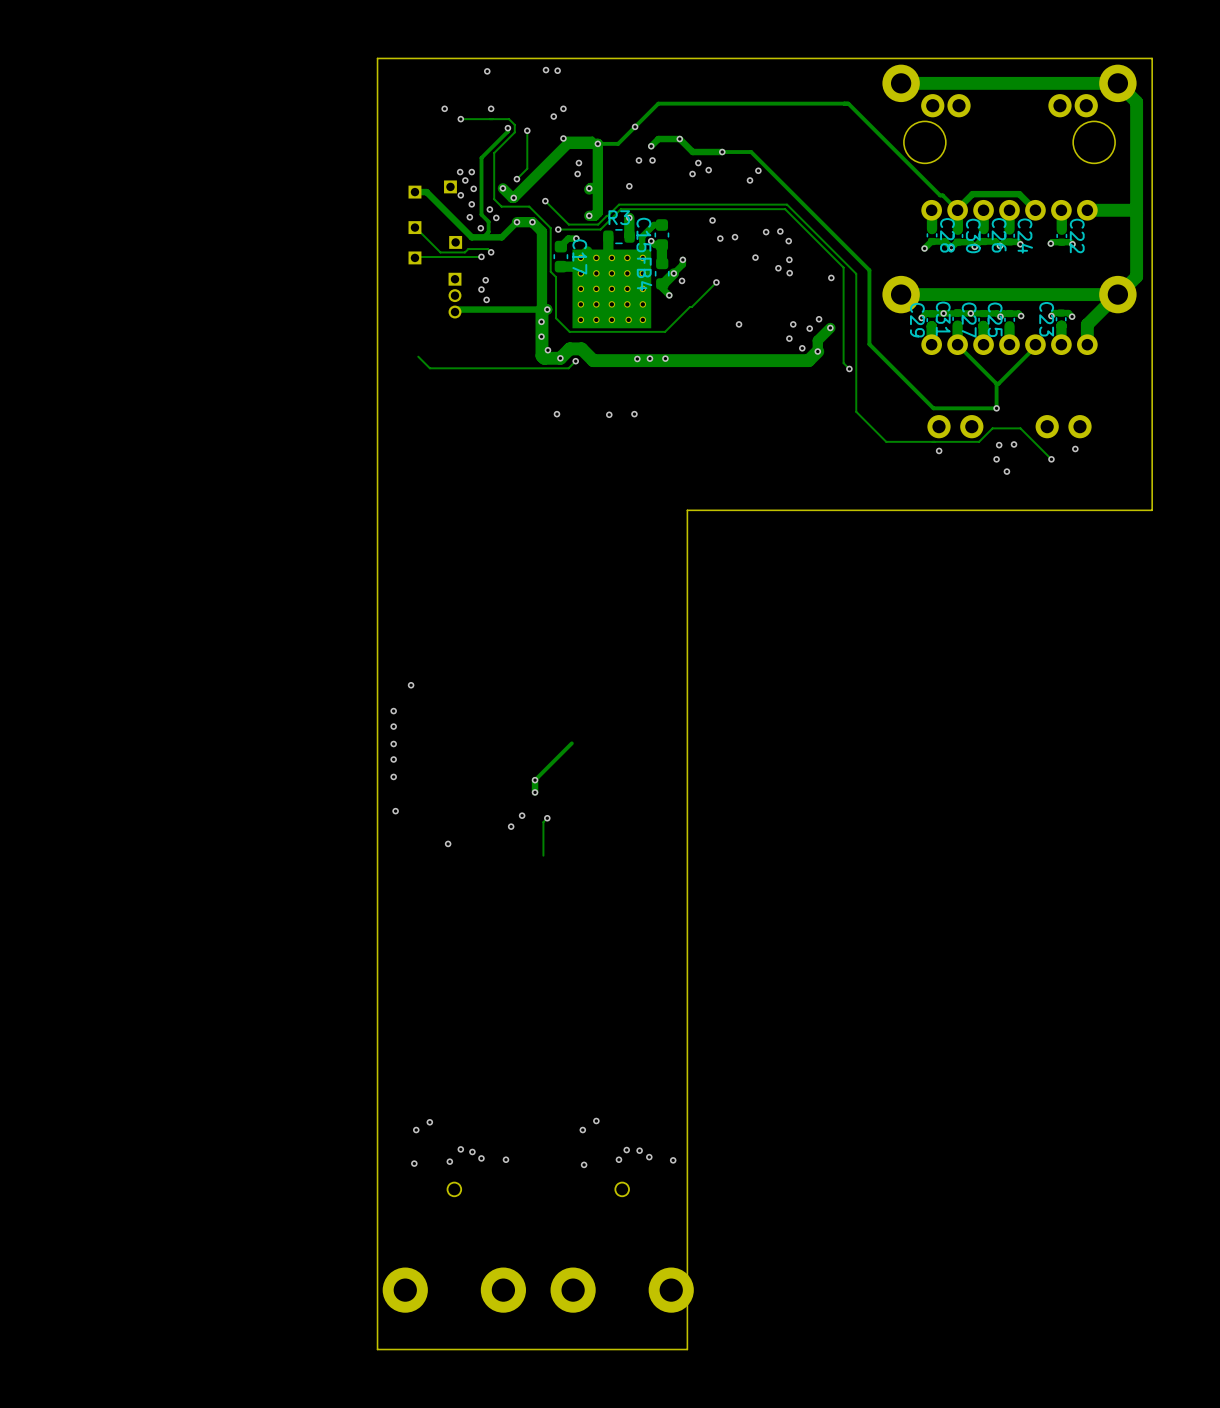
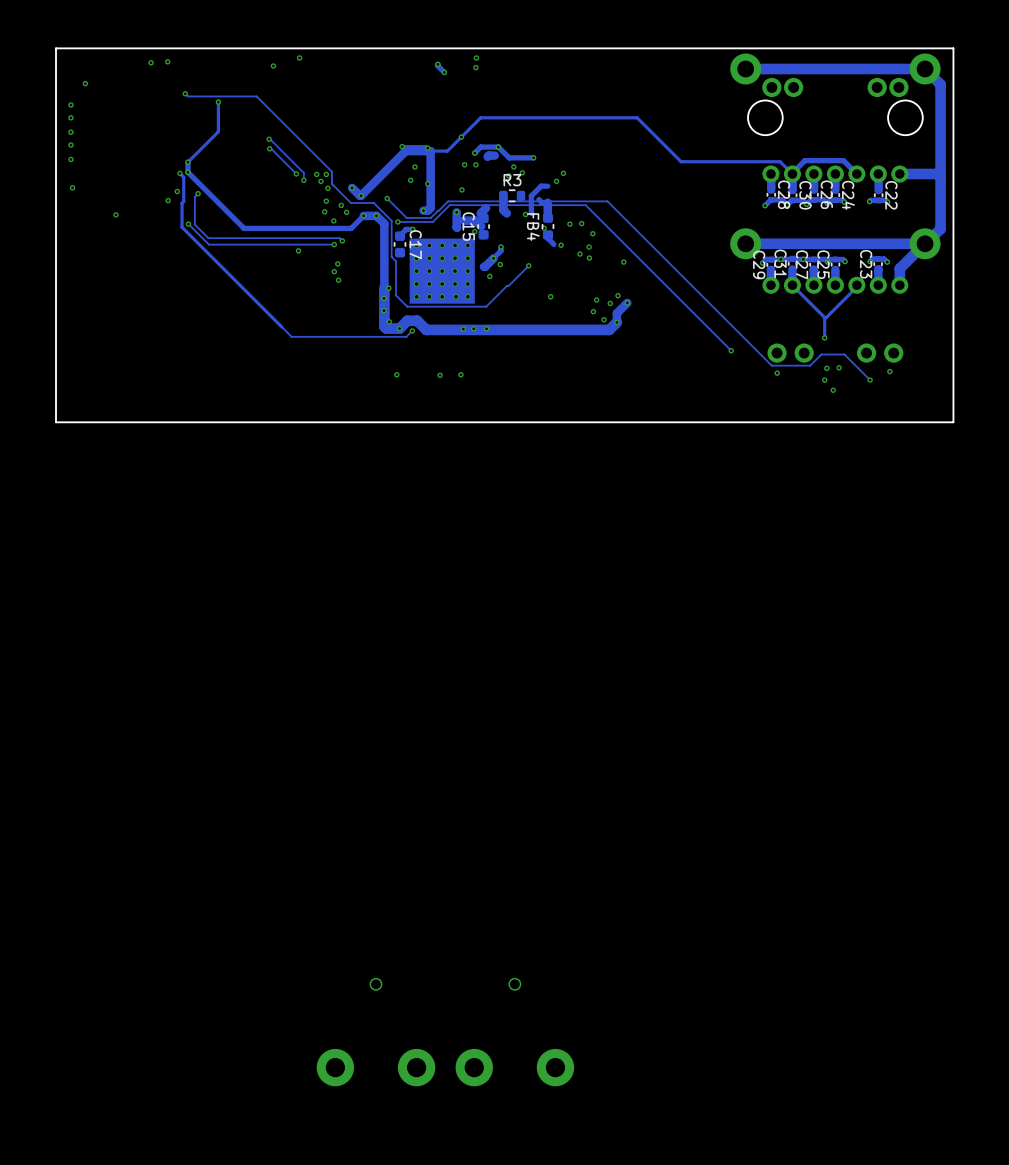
board edge: (377, 58) (377, 1349) (687, 1349) (687, 510) -> (312, 48) (56, 48) (56, 422) (568, 422)
via: none -> (299, 57)
via: (546, 70) -> none
via: (557, 70) -> none
via: none -> (476, 57)
via: (487, 71) -> none
via: none -> (167, 61)
via: none -> (151, 62)
track: none -> (437, 64) (444, 72)
via: none -> (437, 64)
via: none -> (273, 66)
via: none -> (475, 67)
via: none -> (444, 72)
via: none -> (85, 83)
via: (444, 108) -> none
via: (491, 108) -> none
via: (563, 108) -> none
track: none -> (185, 93) (187, 96) (256, 96) (331, 171) (331, 184)
via: none -> (185, 93)
via: (553, 116) -> none
track: (460, 119) (509, 119) (514, 124) (514, 132) (494, 153) (494, 199) (501, 206) (529, 206) (550, 228) (550, 271) (556, 277) (556, 318) (569, 331) (665, 331) (716, 282) -> none
via: (460, 119) -> none
track: none -> (218, 102) (218, 131) (187, 162) (187, 172) (244, 228) (351, 228) (363, 215) (376, 215) (384, 223) (384, 326) (386, 328) (399, 328) (407, 320) (417, 320) (426, 329) (609, 329) (616, 322) (616, 313) (627, 302)
via: none -> (218, 102)
via: none -> (70, 105)
via: (635, 126) -> none
track: (507, 128) (507, 131) (481, 157) (481, 214) (488, 221) (488, 231) (483, 237) (471, 237) -> none
via: (507, 128) -> none
track: (527, 130) (527, 168) (516, 179) -> none
via: (527, 130) -> none
track: (563, 138) (592, 138) (597, 143) -> (402, 146) (426, 146) (430, 151)
via: (563, 138) -> none
via: (679, 139) -> none
via: none -> (70, 117)
track: (597, 143) (618, 143) (658, 103) (848, 103) (940, 195) -> (430, 151) (447, 151) (480, 117) (637, 117) (681, 161) (778, 161)
track: (597, 143) (567, 143) (513, 197) (502, 188) -> (430, 151) (405, 151) (361, 195) (352, 187)
track: (597, 143) (597, 212) (594, 215) (589, 215) -> (430, 151) (430, 207) (427, 210) (423, 210)
via: (597, 143) -> none
track: (651, 146) (658, 139) (679, 139) (692, 152) (751, 152) (869, 270) (869, 344) (933, 408) (996, 408) -> none
via: (651, 146) -> none
via: (722, 152) -> none
via: none -> (70, 132)
via: (638, 160) -> none
via: (652, 160) -> none
via: (578, 163) -> none
via: (698, 163) -> none
via: none -> (461, 137)
track: none -> (269, 139) (303, 173) (303, 180)
via: none -> (269, 139)
via: (708, 170) -> none
via: (758, 170) -> none
via: (460, 172) -> none
via: (471, 172) -> none
via: (577, 174) -> none
via: (692, 174) -> none
via: none -> (70, 145)
via: none -> (402, 146)
via: none -> (498, 147)
track: none -> (269, 148) (296, 173)
via: none -> (269, 148)
via: (465, 180) -> none
via: (750, 180) -> none
track: none -> (474, 153) (480, 147) (498, 147) (509, 157) (533, 157)
via: none -> (474, 153)
part: (450, 186) -> none
via: (629, 186) -> none
via: (473, 188) -> none
via: (502, 188) -> none
via: (589, 188) -> none
via: none -> (533, 157)
via: none -> (70, 159)
track: (414, 192) (426, 192) (471, 237) -> none
part: (414, 192) -> none
via: none -> (187, 162)
via: (460, 195) -> none
via: (513, 197) -> none
via: none -> (464, 164)
via: none -> (475, 164)
via: none -> (414, 166)
track: (545, 201) (568, 224) (598, 224) (619, 204) (787, 204) (856, 273) (856, 411) (886, 441) (932, 441) -> (387, 198) (406, 217) (430, 217) (448, 201) (607, 201) (771, 365)
via: (545, 201) -> none
via: none -> (513, 166)
via: (471, 204) -> none
via: none -> (187, 172)
via: none -> (522, 172)
track: none -> (179, 173) (183, 177) (182, 227) (291, 336) (406, 336) (412, 330)
via: none -> (179, 173)
via: (489, 209) -> none
via: none -> (563, 173)
via: none -> (296, 173)
via: none -> (316, 174)
via: none -> (326, 174)
via: none -> (509, 176)
via: (589, 215) -> none
via: none -> (303, 180)
via: (469, 217) -> none
track: (629, 217) (629, 236) -> (456, 212) (457, 227)
via: (629, 217) -> none
via: none -> (320, 181)
via: none -> (556, 181)
via: (712, 220) -> none
track: none -> (331, 183) (350, 203) (373, 203) (391, 220) (391, 256) (396, 261) (396, 295) (407, 306) (486, 306) (528, 265)
via: (532, 222) -> none
via: none -> (72, 187)
track: (414, 226) (440, 252) (464, 252) (468, 249) (487, 249) (491, 252) -> none
via: none -> (327, 188)
part: (414, 227) -> none
via: none -> (352, 187)
via: (480, 228) -> none
track: (558, 229) (600, 229) (620, 209) (785, 209) (843, 267) (843, 363) (849, 368) -> none
via: none -> (177, 191)
via: (780, 231) -> none
via: (766, 232) -> none
track: none -> (198, 193) (194, 196) (194, 224) (208, 238) (339, 238) (342, 240)
via: none -> (198, 193)
C15 position: (661, 235) -> (483, 226)
via: none -> (361, 195)
track: (471, 237) (501, 237) (516, 222) (532, 222) (541, 231) (541, 355) (544, 358) (560, 358) (569, 348) (581, 348) (593, 360) (808, 360) (817, 351) (817, 340) (830, 327) -> none
via: (735, 237) -> none
track: (576, 238) (568, 238) (562, 244) -> (412, 229) (406, 229) (401, 234)
via: (576, 238) -> none
via: (720, 238) -> none
via: none -> (387, 198)
via: (651, 241) -> none
via: (788, 241) -> none
via: none -> (168, 200)
part: (455, 242) -> none
via: none -> (326, 201)
via: none -> (341, 205)
via: (491, 252) -> none
via: none -> (423, 210)
via: none -> (324, 211)
via: none -> (346, 212)
via: (481, 256) -> none
via: none -> (456, 212)
C17 position: (560, 256) -> (400, 244)
part: (414, 257) -> none
track: (481, 257) (414, 257) -> none
via: (755, 257) -> none
via: none -> (116, 214)
via: none -> (525, 214)
track: (682, 259) (682, 264) (662, 283) -> (500, 247) (500, 250) (483, 266)
via: (682, 259) -> none
via: (789, 259) -> none
via: none -> (363, 215)
via: none -> (376, 215)
via: none -> (333, 220)
track: none -> (397, 221) (432, 221) (449, 205) (585, 205) (731, 350)
via: none -> (397, 221)
via: (778, 268) -> none
track: none -> (188, 224) (208, 244) (334, 244)
via: none -> (188, 224)
via: none -> (569, 224)
via: none -> (581, 223)
via: (673, 273) -> none
via: (789, 273) -> none
via: none -> (544, 228)
via: none -> (412, 229)
via: (831, 277) -> none
via: none -> (474, 231)
via: (485, 280) -> none
via: (682, 280) -> none
part position: (611, 288) -> (442, 271)
via: (481, 289) -> none
via: none -> (342, 240)
via: none -> (334, 244)
part: (454, 295) -> none
via: (669, 295) -> none
via: none -> (561, 245)
via: none -> (500, 247)
via: none -> (589, 247)
via: (486, 299) -> none
via: none -> (298, 250)
via: none -> (580, 254)
track: (547, 309) (456, 309) (454, 311) -> none
via: (547, 309) -> none
via: none -> (589, 258)
via: none -> (493, 258)
via: none -> (623, 262)
via: none -> (337, 263)
via: none -> (500, 264)
via: (819, 319) -> none
via: (541, 321) -> none
via: none -> (528, 265)
via: (739, 324) -> none
via: (793, 324) -> none
via: (830, 327) -> none
via: none -> (334, 271)
via: (809, 328) -> none
via: none -> (489, 276)
via: (541, 336) -> none
via: none -> (338, 280)
via: (789, 338) -> none
via: none -> (388, 288)
via: (802, 348) -> none
via: (547, 350) -> none
via: (817, 351) -> none
track: (418, 356) (429, 368) (568, 368) (575, 361) -> none
via: none -> (617, 295)
via: (560, 358) -> none
via: (637, 358) -> none
via: (649, 358) -> none
via: none -> (384, 298)
via: (575, 361) -> none
via: none -> (596, 299)
via: none -> (610, 303)
via: none -> (627, 302)
via: (849, 368) -> none
via: none -> (384, 310)
via: none -> (593, 311)
via: none -> (604, 319)
via: none -> (389, 321)
via: none -> (616, 322)
via: none -> (399, 328)
via: none -> (463, 329)
via: none -> (473, 328)
via: none -> (486, 328)
via: none -> (412, 330)
via: (556, 414) -> none
via: (609, 414) -> none
via: (634, 414) -> none
via: none -> (731, 350)
via: none -> (396, 374)
via: none -> (460, 374)
via: none -> (440, 375)
via: (411, 685) -> none
via: (393, 711) -> none
via: (393, 726) -> none
track: (571, 743) (535, 780) (535, 792) -> none
via: (393, 744) -> none
via: (393, 759) -> none
via: (393, 776) -> none
via: (535, 780) -> none
via: (535, 792) -> none
via: (395, 811) -> none
via: (522, 815) -> none
track: (547, 818) (543, 822) (543, 855) -> none
via: (547, 818) -> none
via: (511, 826) -> none
via: (448, 843) -> none
via: (596, 1121) -> none
via: (429, 1122) -> none
via: (416, 1130) -> none
via: (582, 1130) -> none
via: (460, 1149) -> none
via: (626, 1150) -> none
via: (639, 1150) -> none
via: (472, 1151) -> none
via: (649, 1157) -> none
via: (481, 1158) -> none
via: (505, 1159) -> none
via: (618, 1159) -> none
via: (673, 1160) -> none
via: (449, 1161) -> none
via: (414, 1163) -> none
via: (584, 1164) -> none

